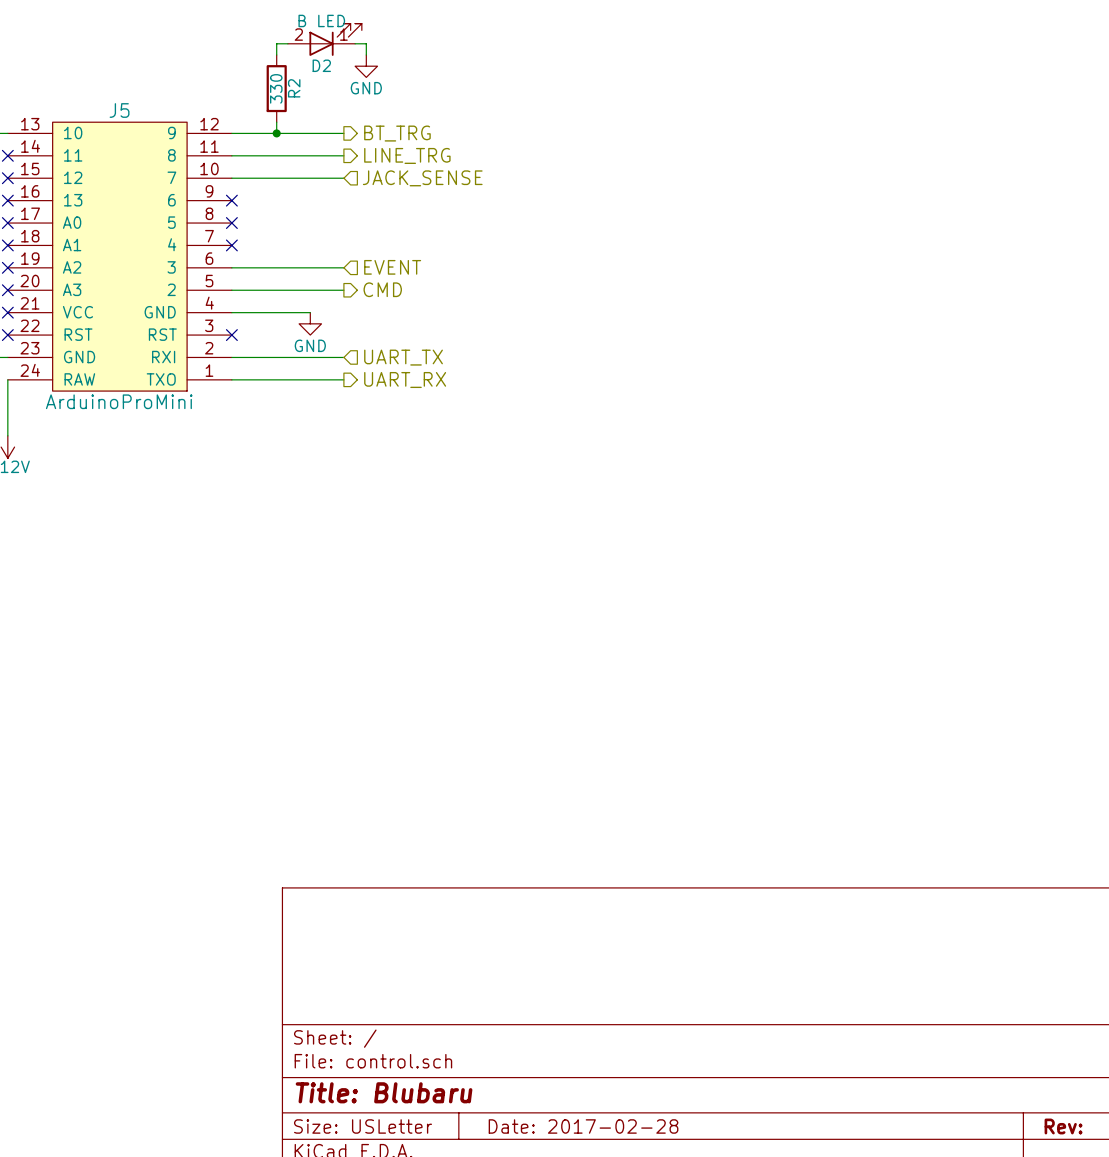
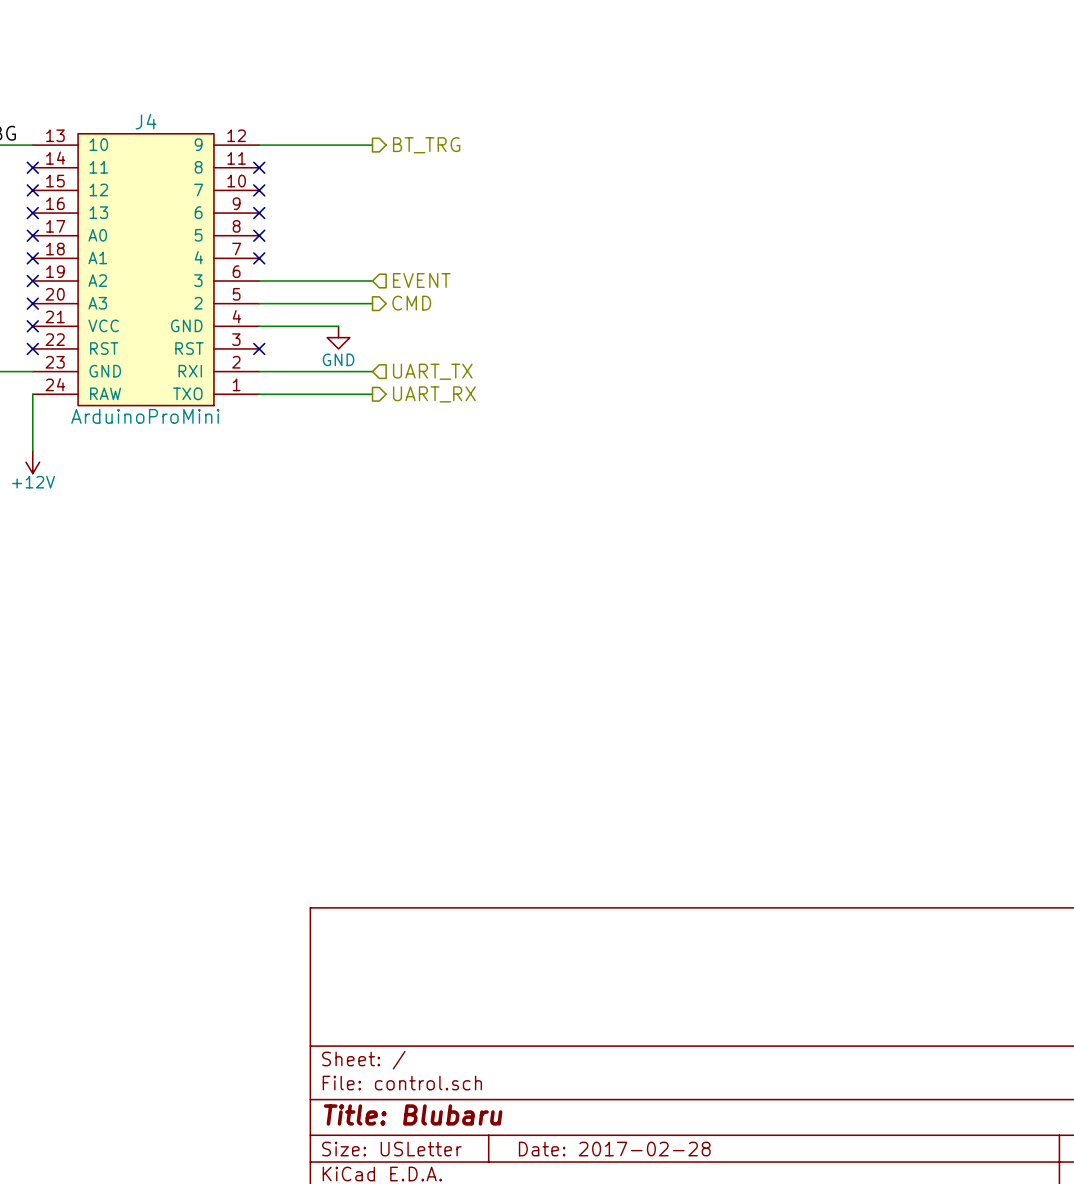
D2: B LED (324, 39) -> none
wire: (287, 43) (276, 43) (276, 54) -> none
wire: (355, 43) (366, 43) (366, 54) -> none
power symbol: GND (366, 66) -> none
R2: 330 (276, 88) -> none
J5 name: J5 (119, 110) -> J4 (146, 121)
wire: (276, 122) (276, 133) -> none
junction: (276, 133) -> none
wire: (231, 155) (343, 155) -> none
no-connect mark: none -> (259, 167)
hierarchical label: LINE_TRG (407, 155) -> none
wire: (231, 178) (343, 178) -> none
no-connect mark: none -> (259, 190)
hierarchical label: JACK_SENSE (422, 178) -> none

